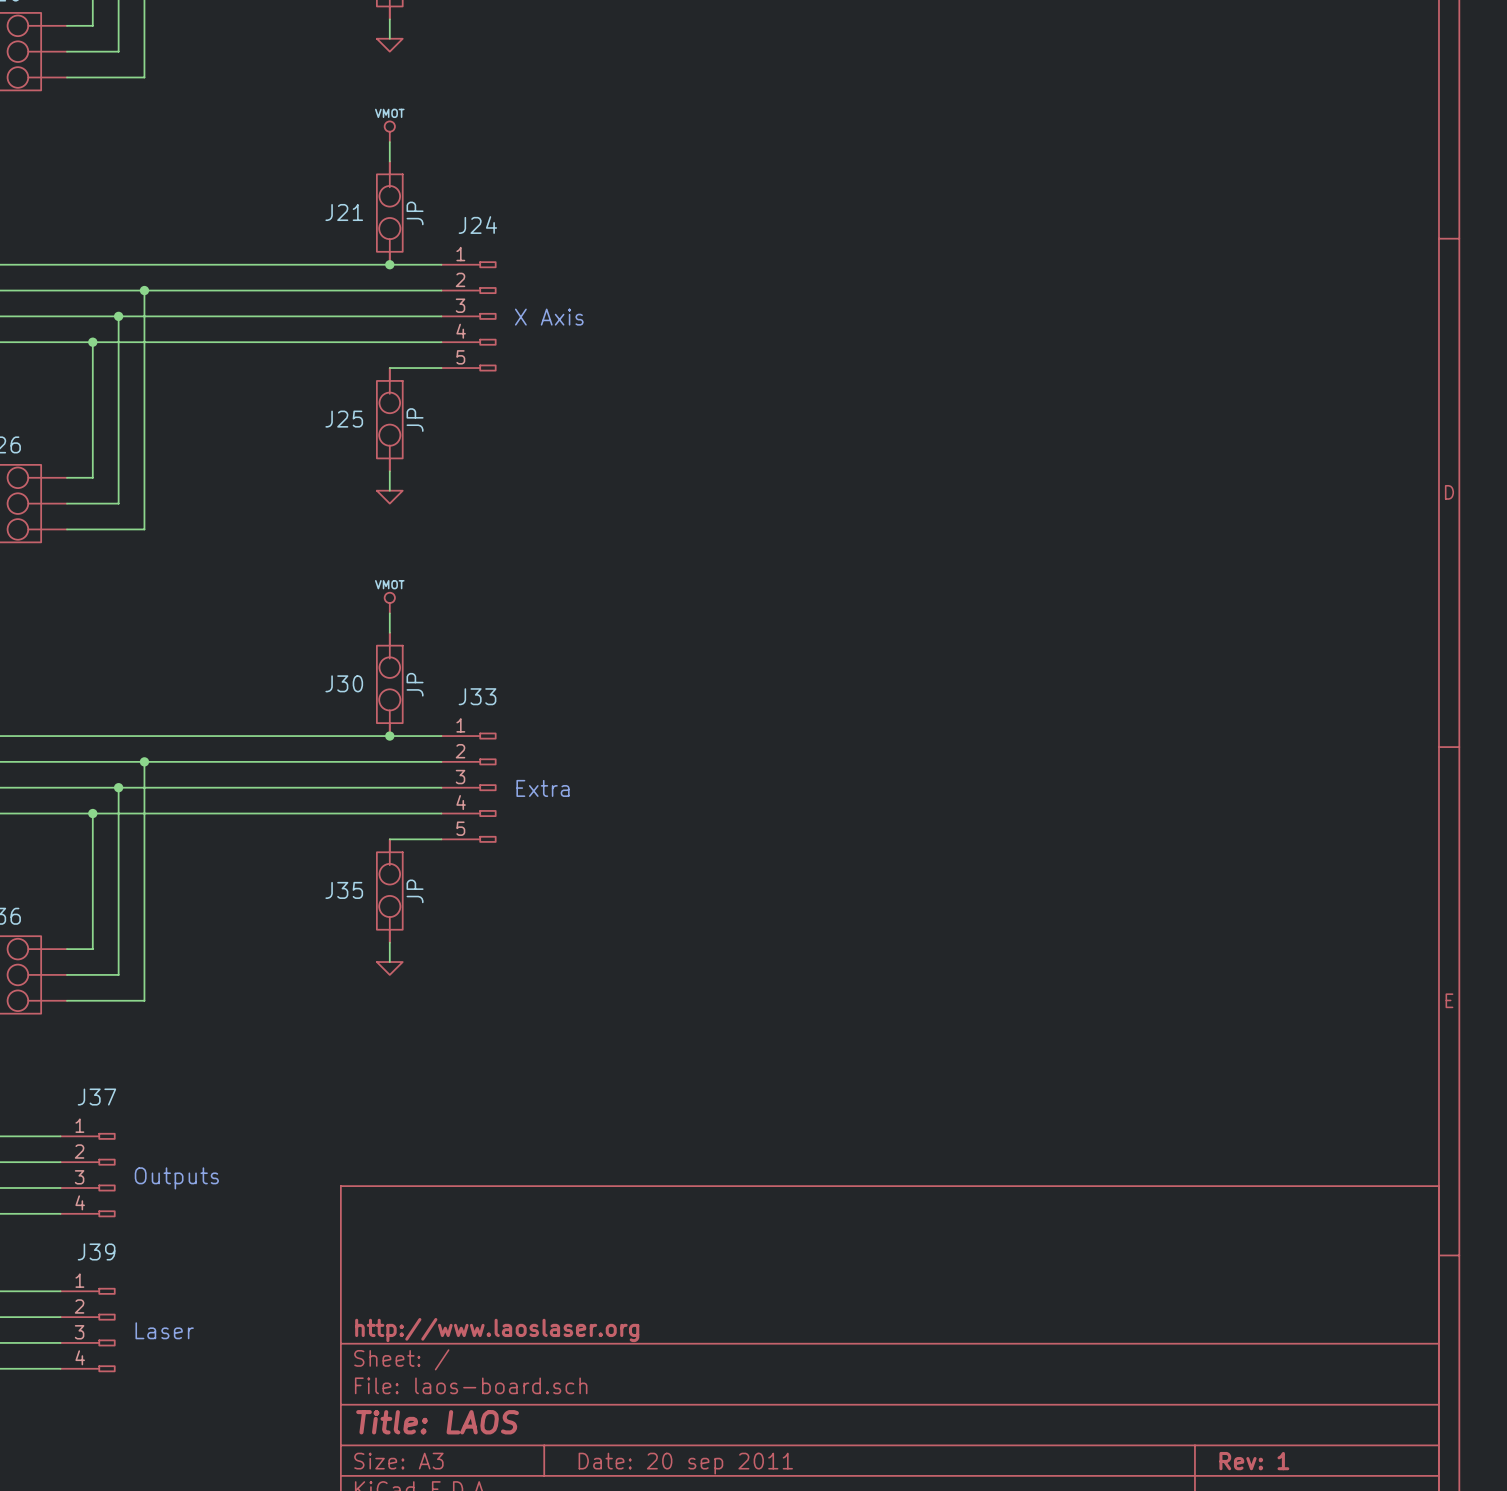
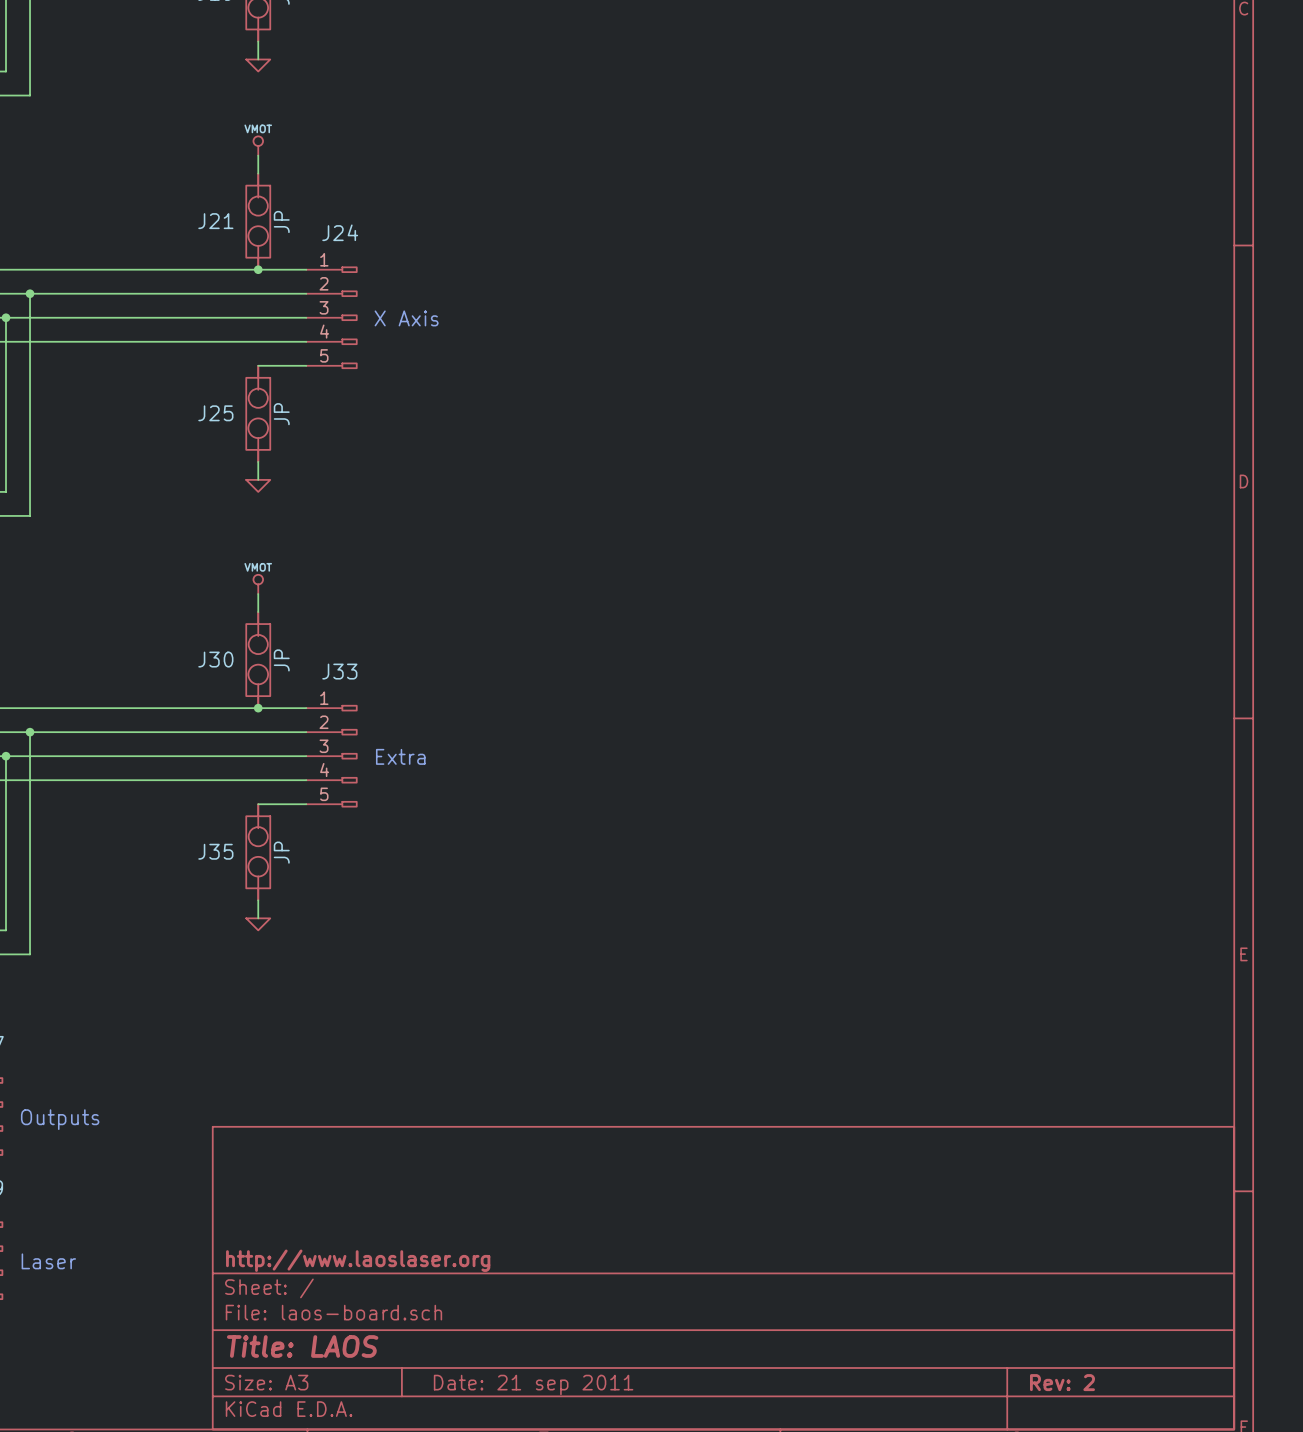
title block: Rev: 1 (1254, 1461) -> Rev: 2 (1062, 1382)
title block: Date: 20 sep 2011 (685, 1463) -> Date: 21 sep 2011 (533, 1384)

